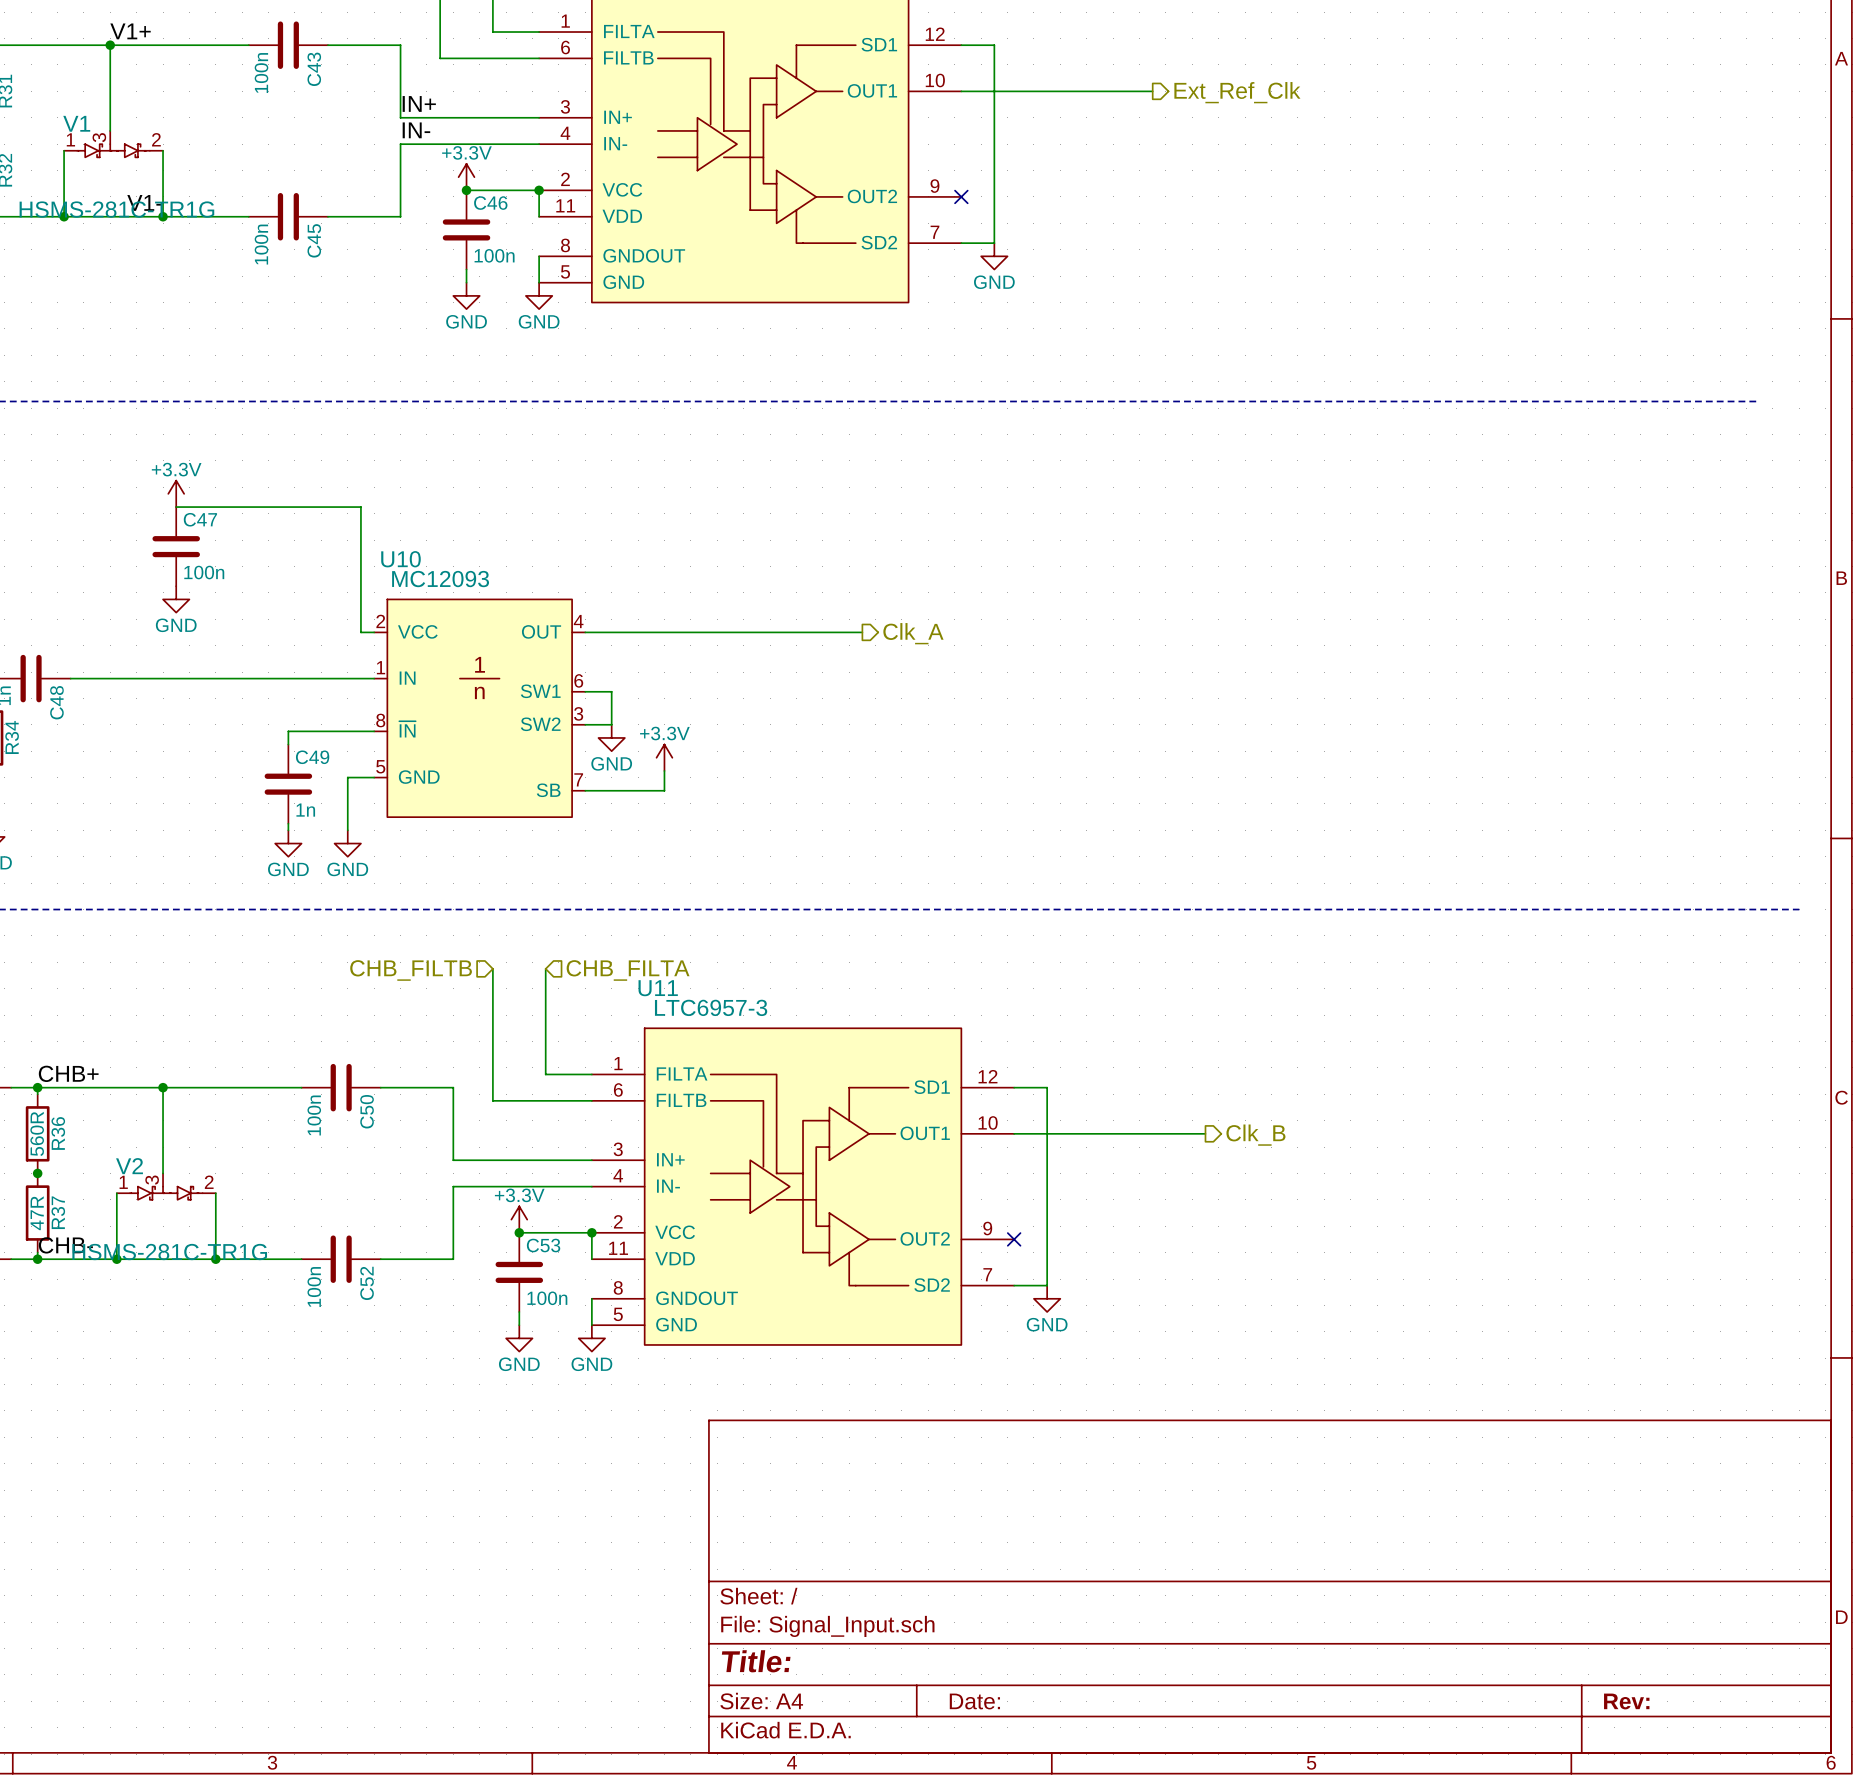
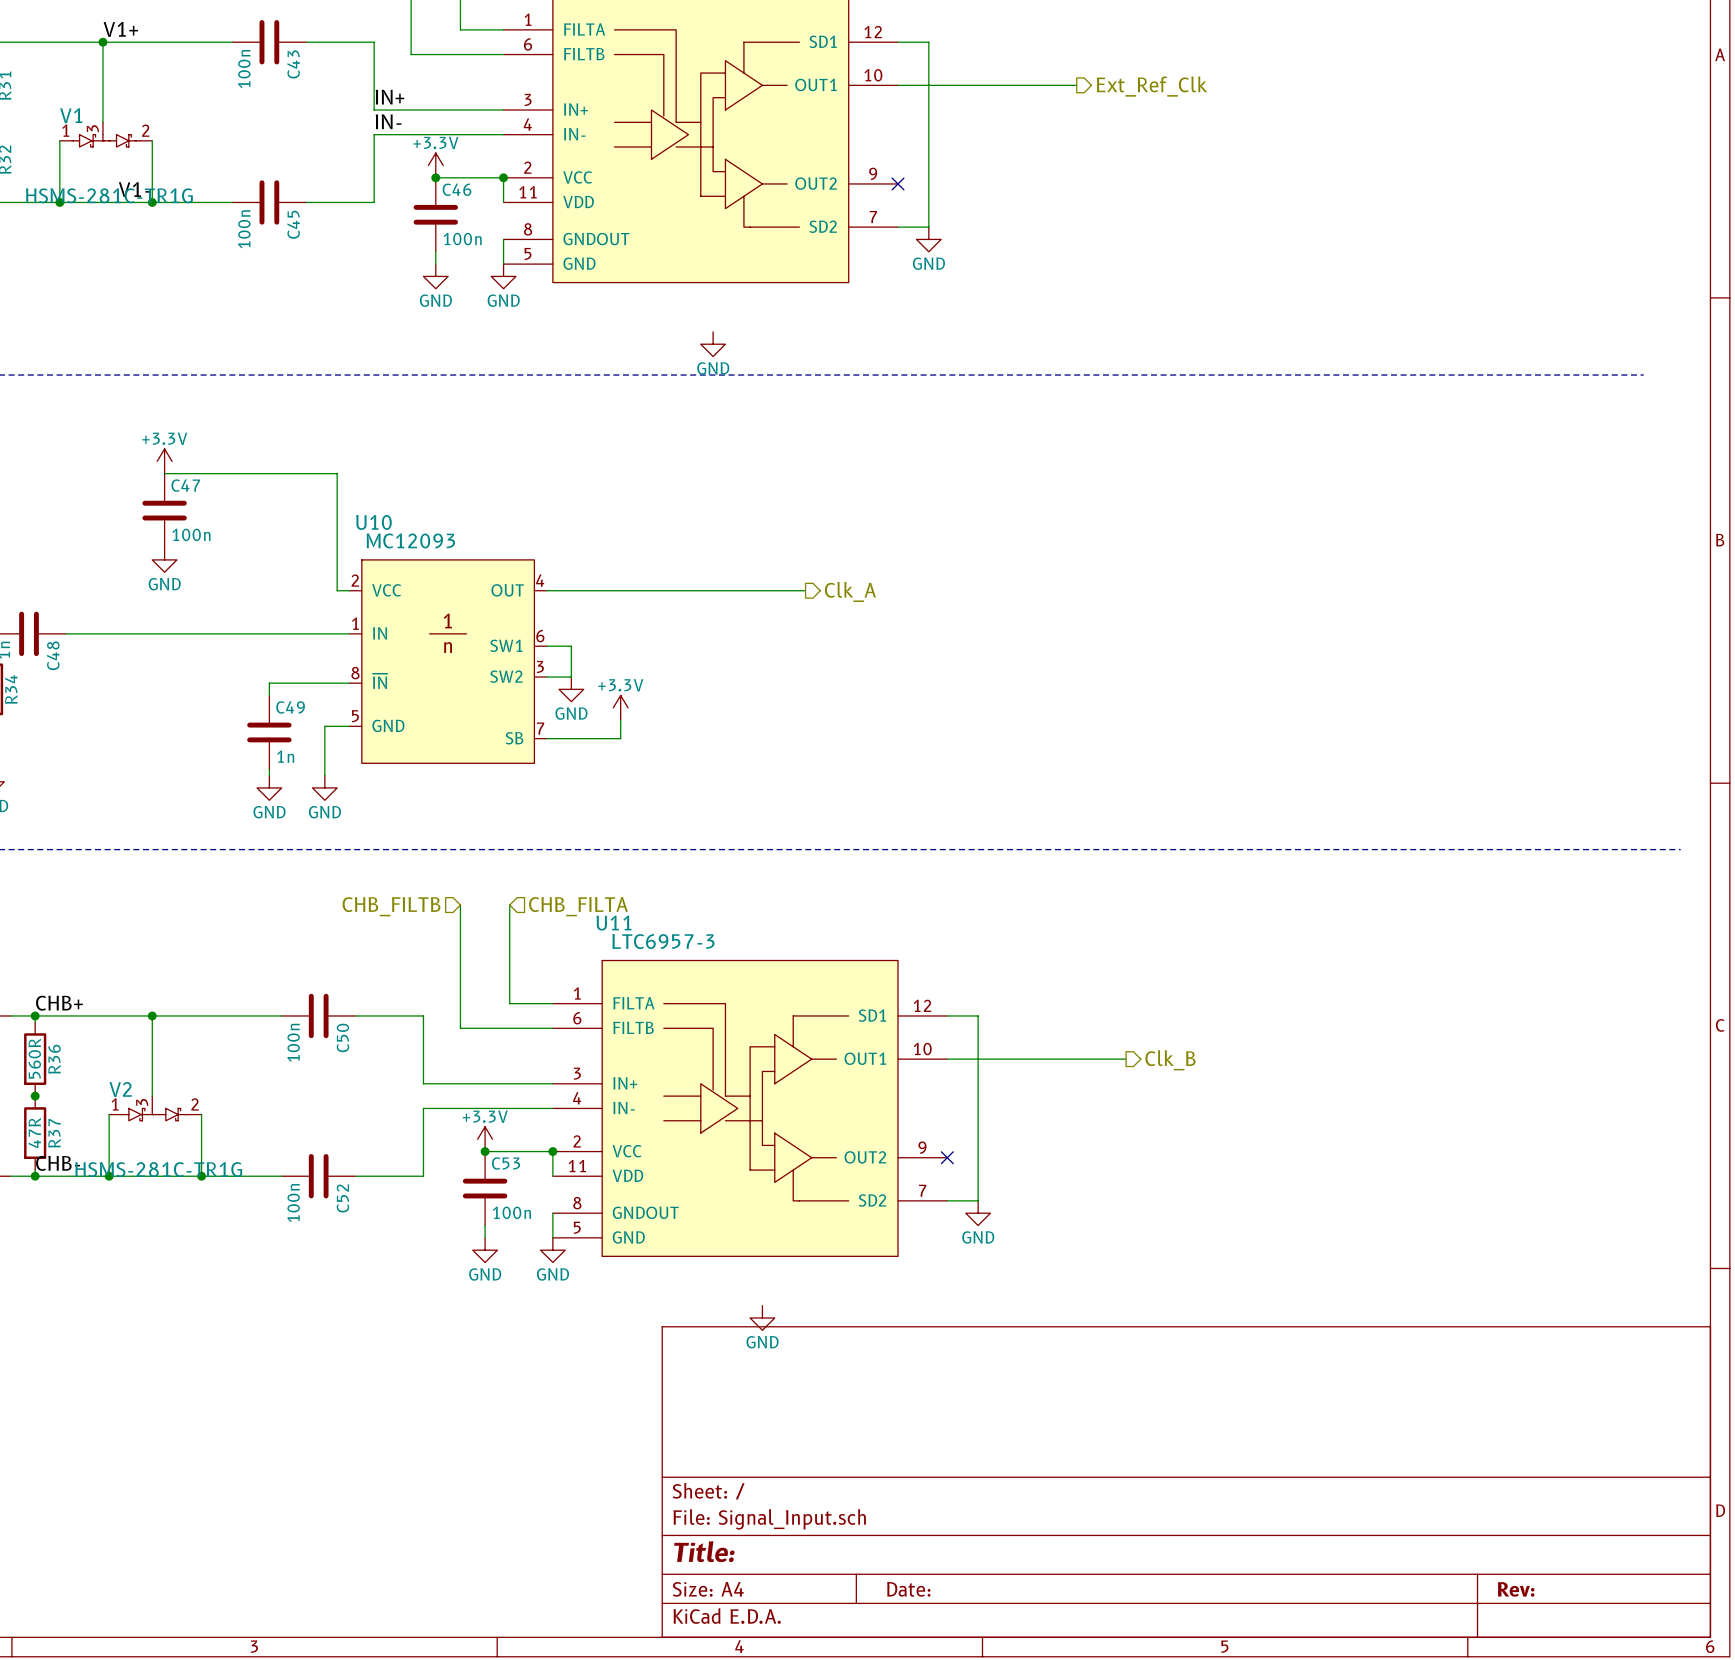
power symbol: none -> GND (713, 344)
power symbol: none -> GND (762, 1317)

